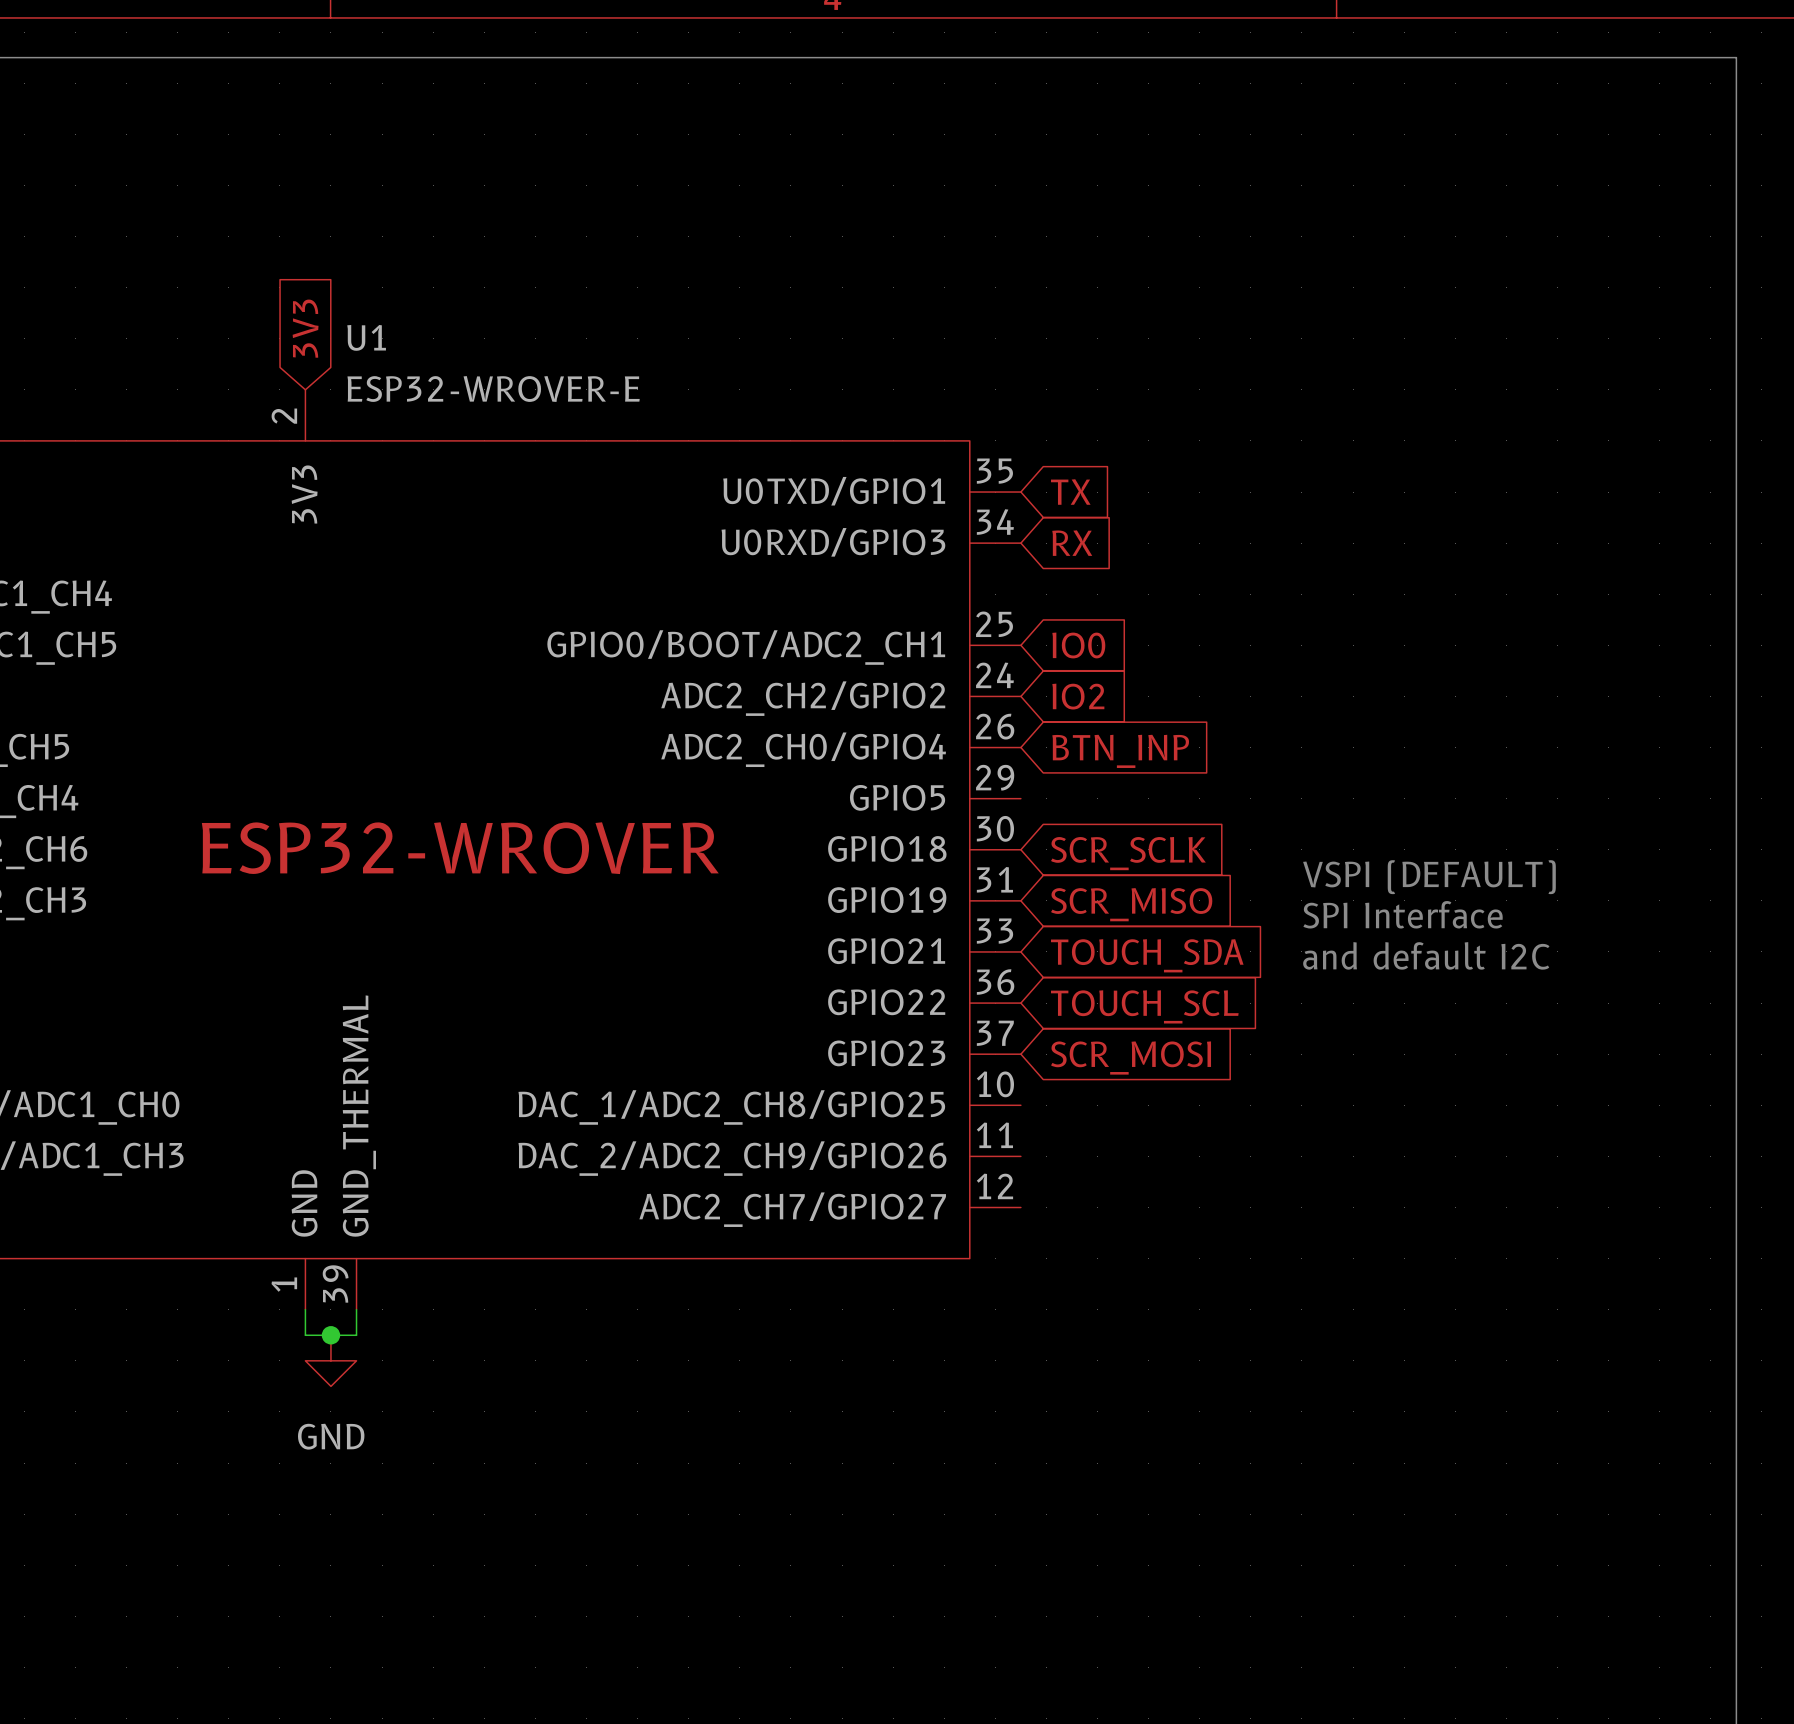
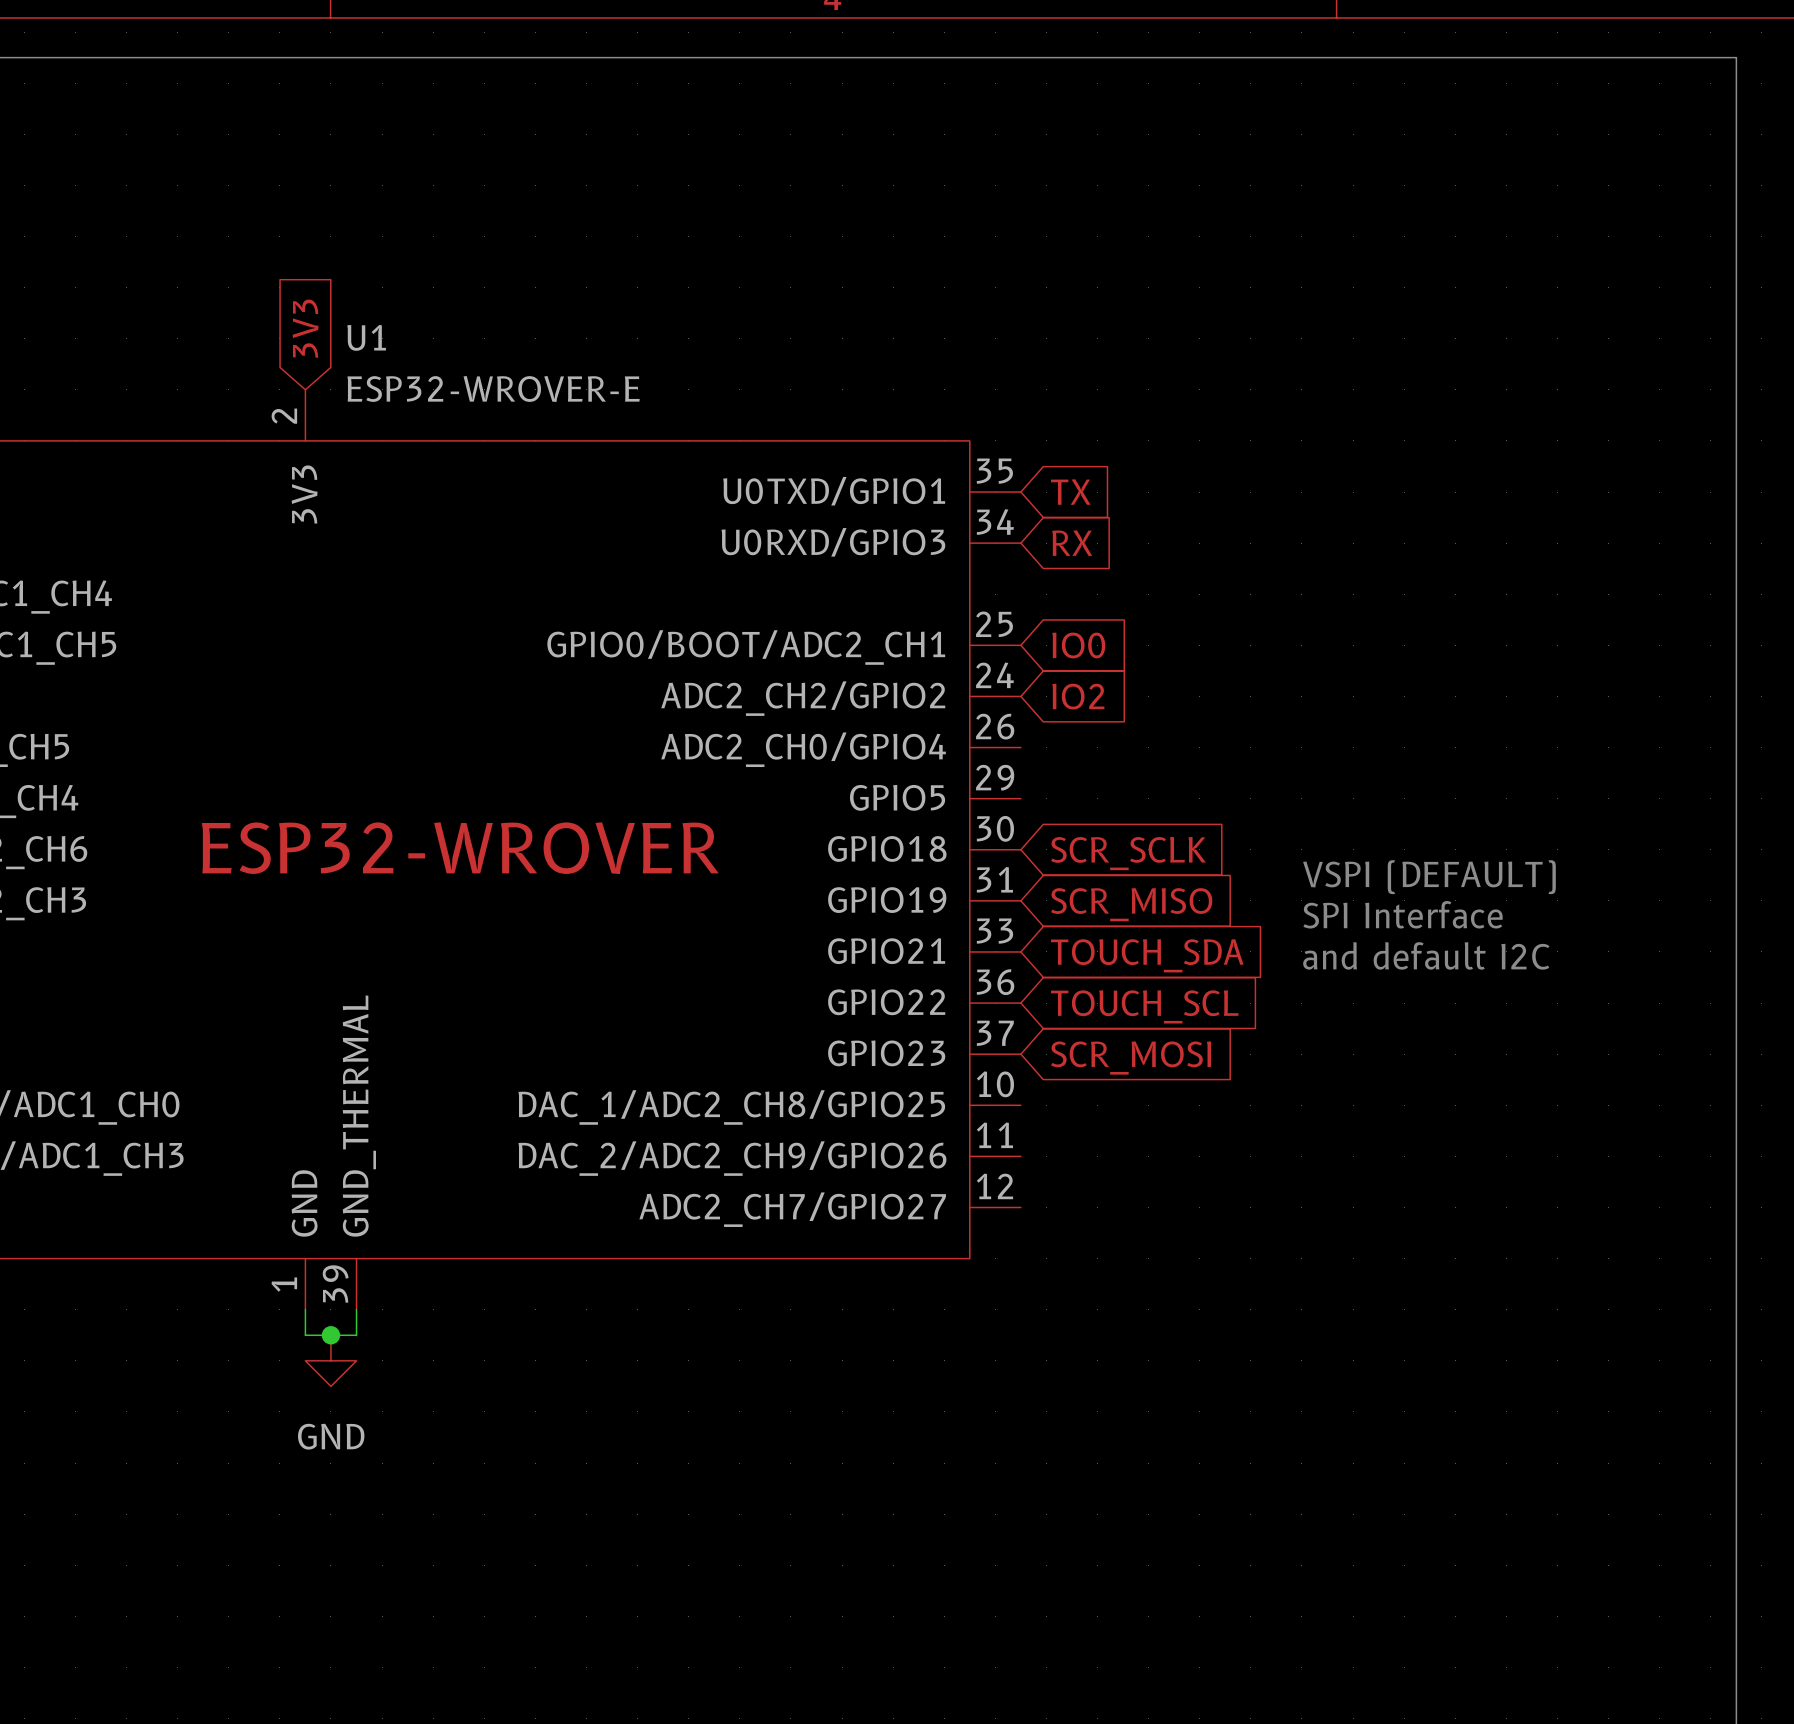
global label: BTN_INP (1120, 751) -> none

